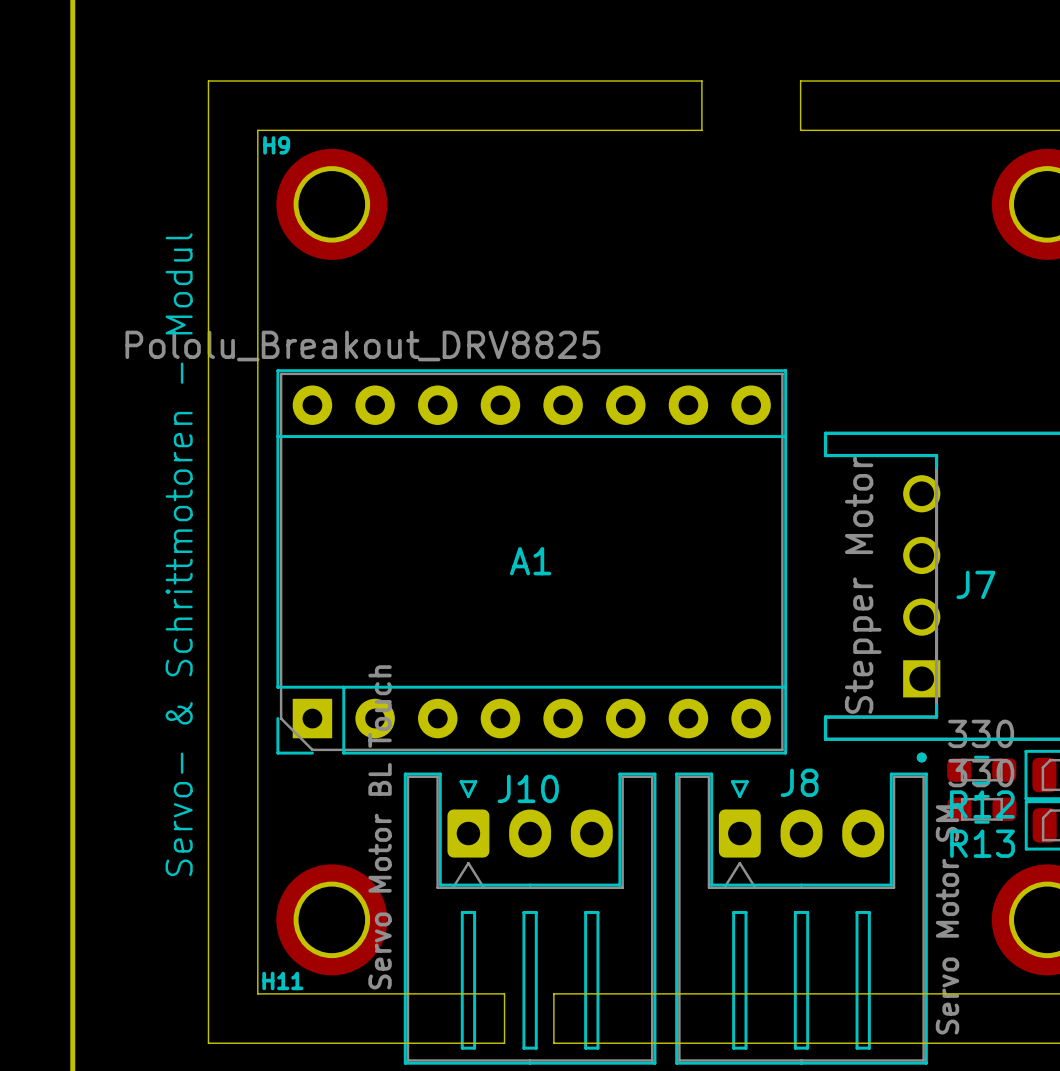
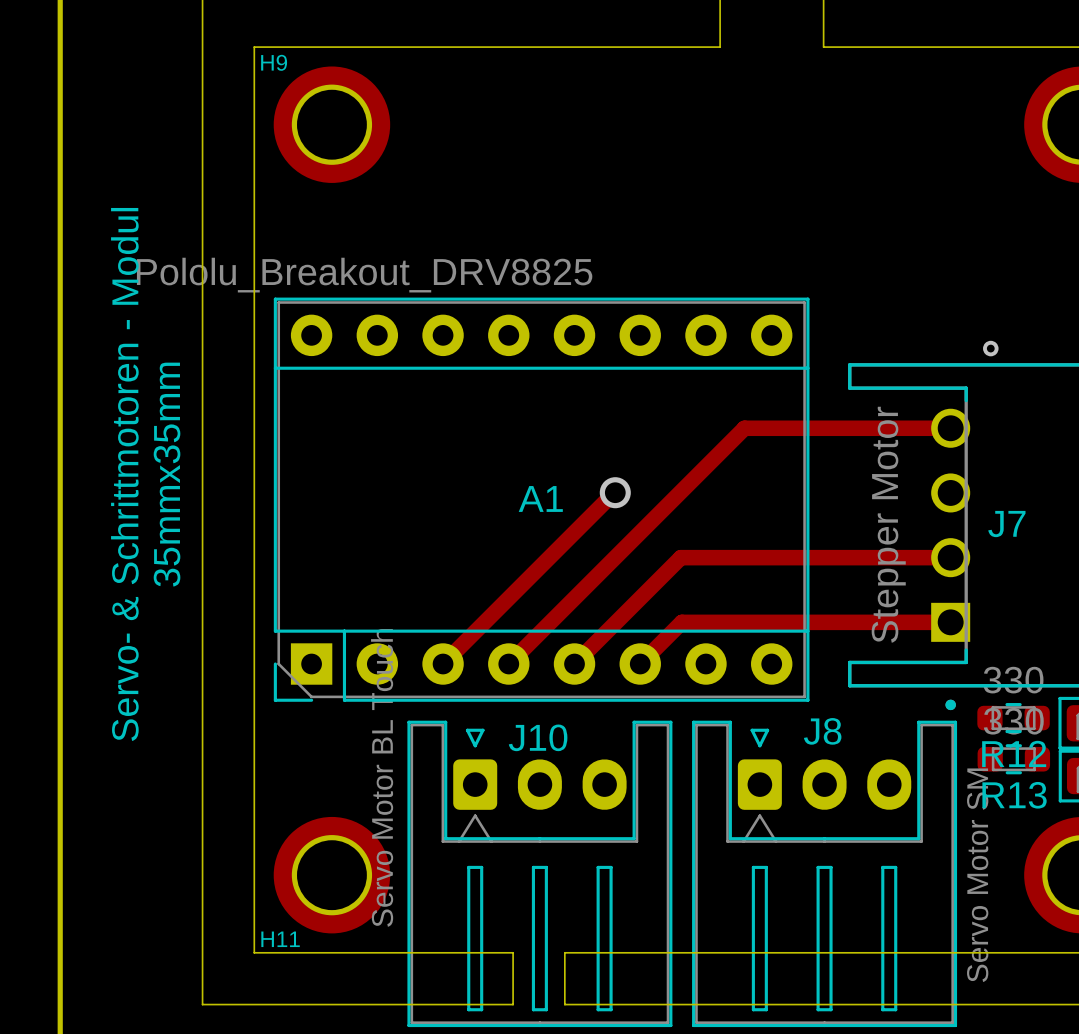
via: none -> (990, 348)
track: none -> (950, 428) (744, 428) (508, 664)
text: none -> 35mmx35mm (167, 474)
text position: Servo- & Schrittmotoren - Modul (179, 554) -> Servo- & Schrittmotoren - Modul (124, 474)
track: none -> (615, 492) (443, 664)
via: none -> (615, 492)
track: none -> (950, 557) (680, 557) (574, 664)
track: none -> (950, 622) (681, 622) (640, 664)

